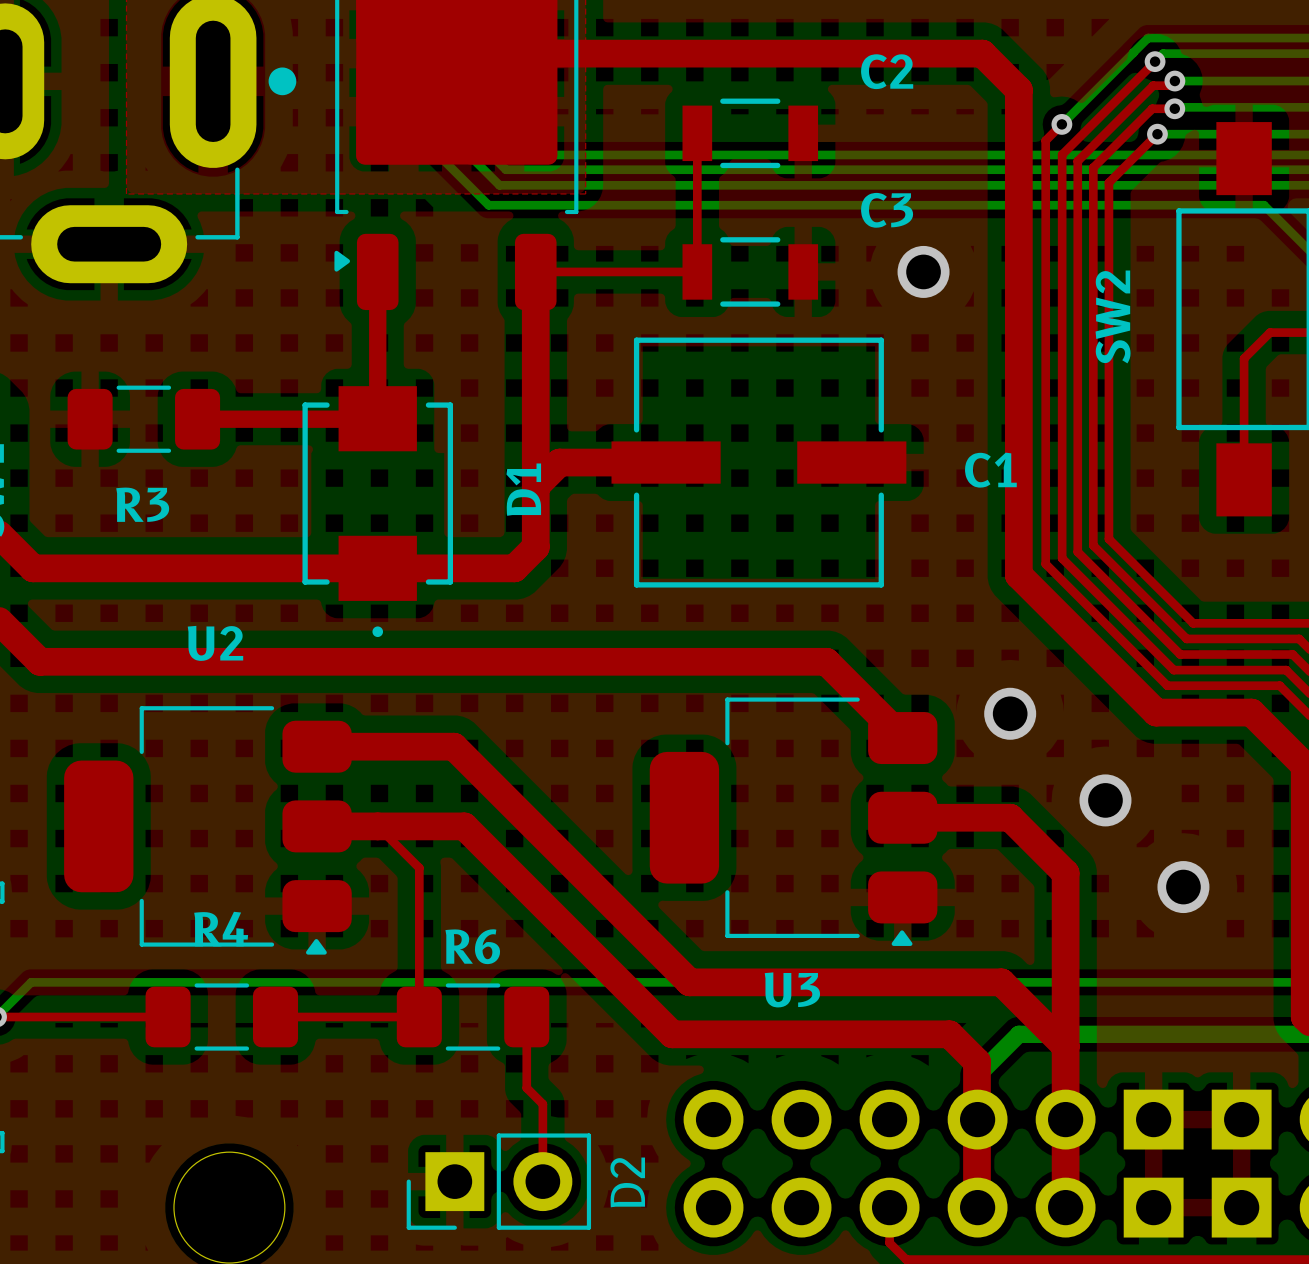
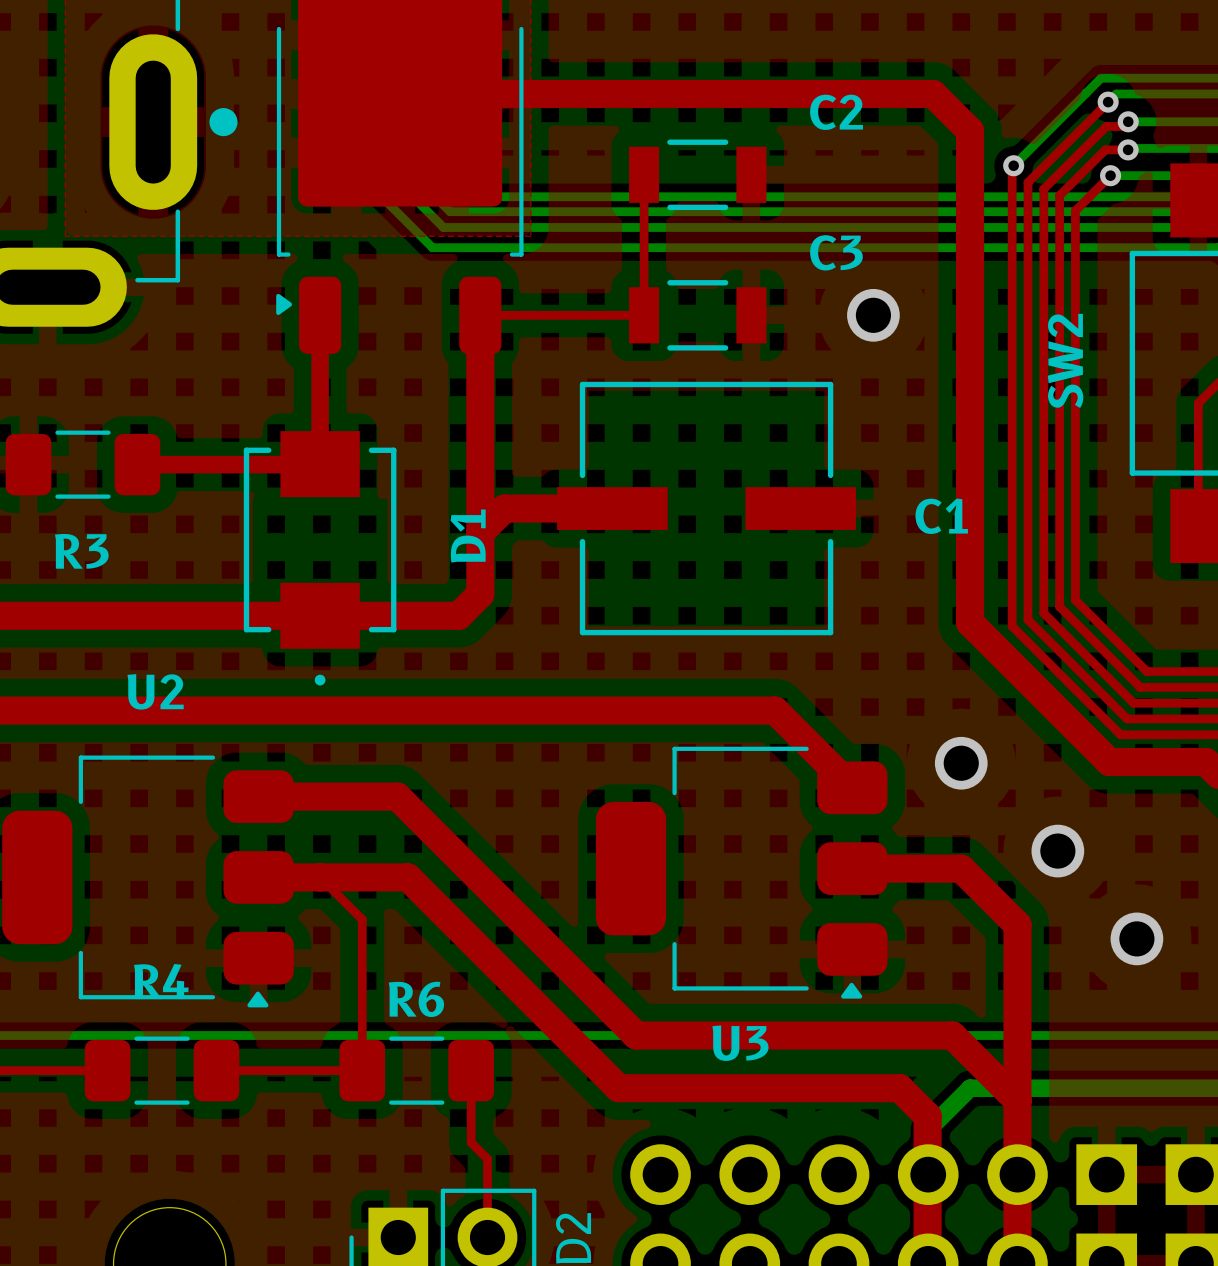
top track: (1060, 125) (1045, 140) (1045, 564) (1060, 578) -> (1012, 167) (1012, 626)
top track: (1076, 140) (1062, 154) (1062, 558) (1076, 572) -> (1028, 182) (1028, 619)
top track: (1091, 147) (1077, 161) (1077, 551) (1091, 565) -> (1043, 189) (1043, 613)
top track: (1107, 153) (1093, 167) (1093, 545) (1107, 559) -> (1059, 195) (1059, 606)
top track: (1122, 168) (1108, 182) (1108, 539) (1122, 552) -> (1075, 210) (1075, 600)

